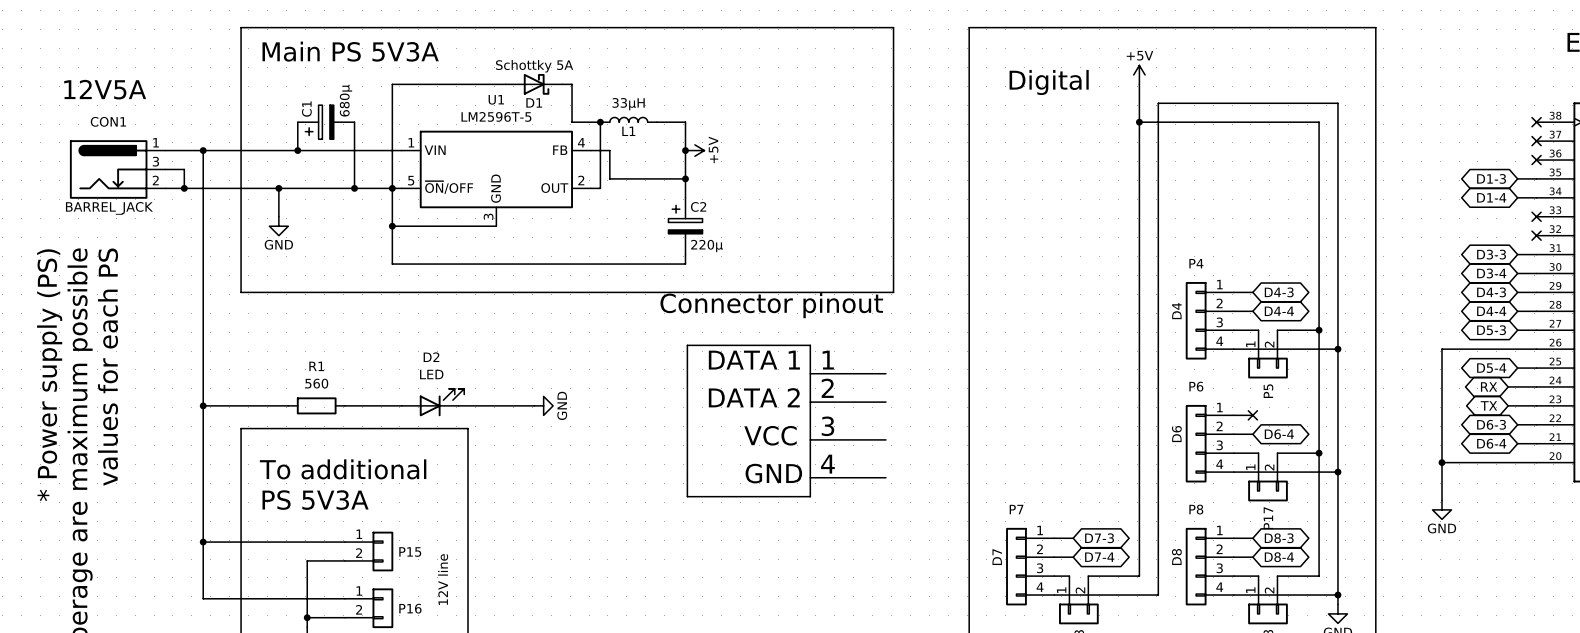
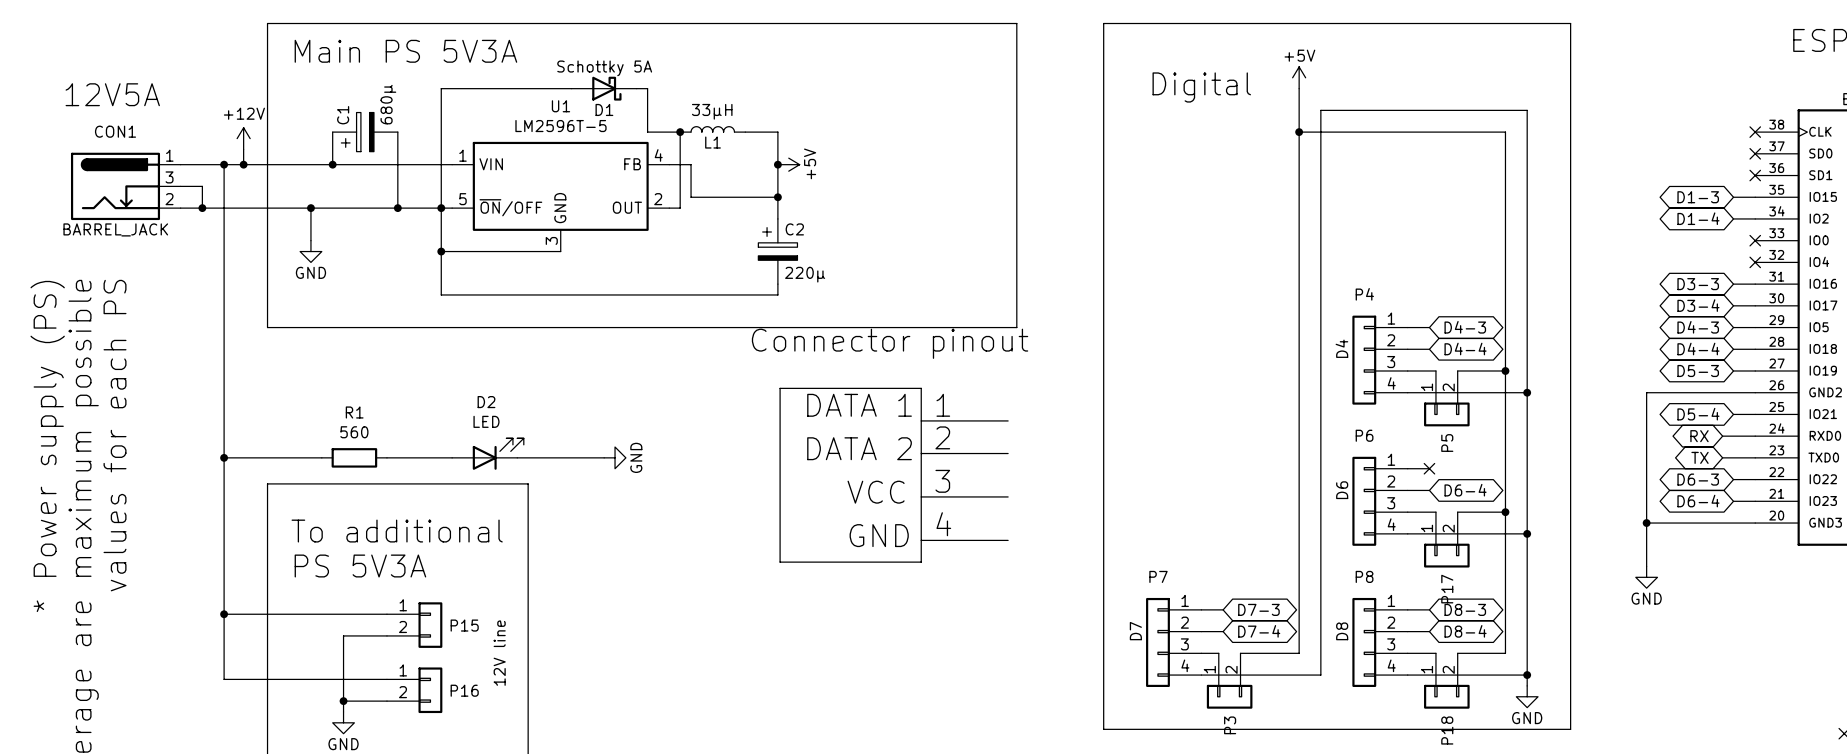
power symbol: none -> +12V (243, 138)
wire: none -> (243, 149) (243, 164)
junction: none -> (243, 164)

